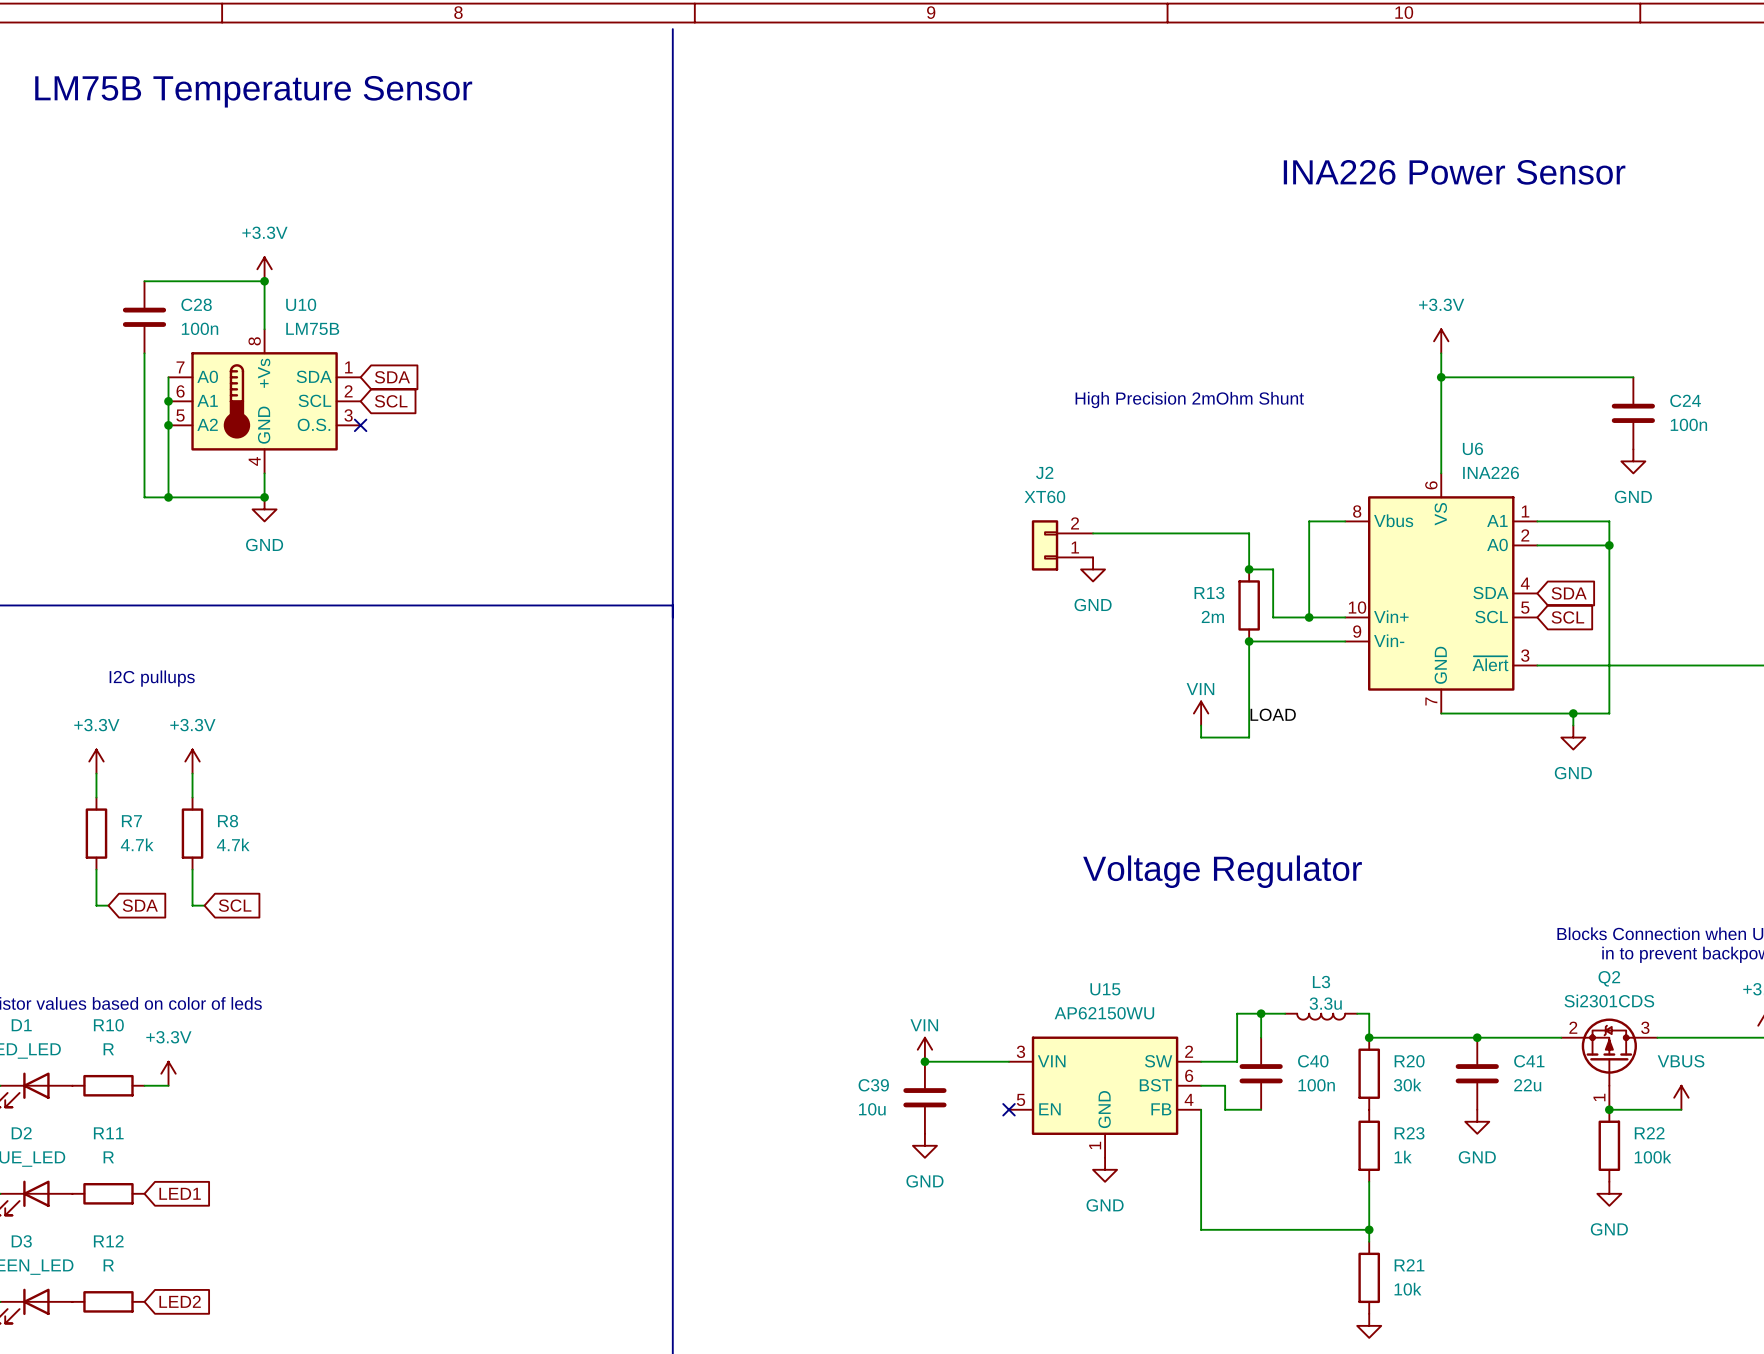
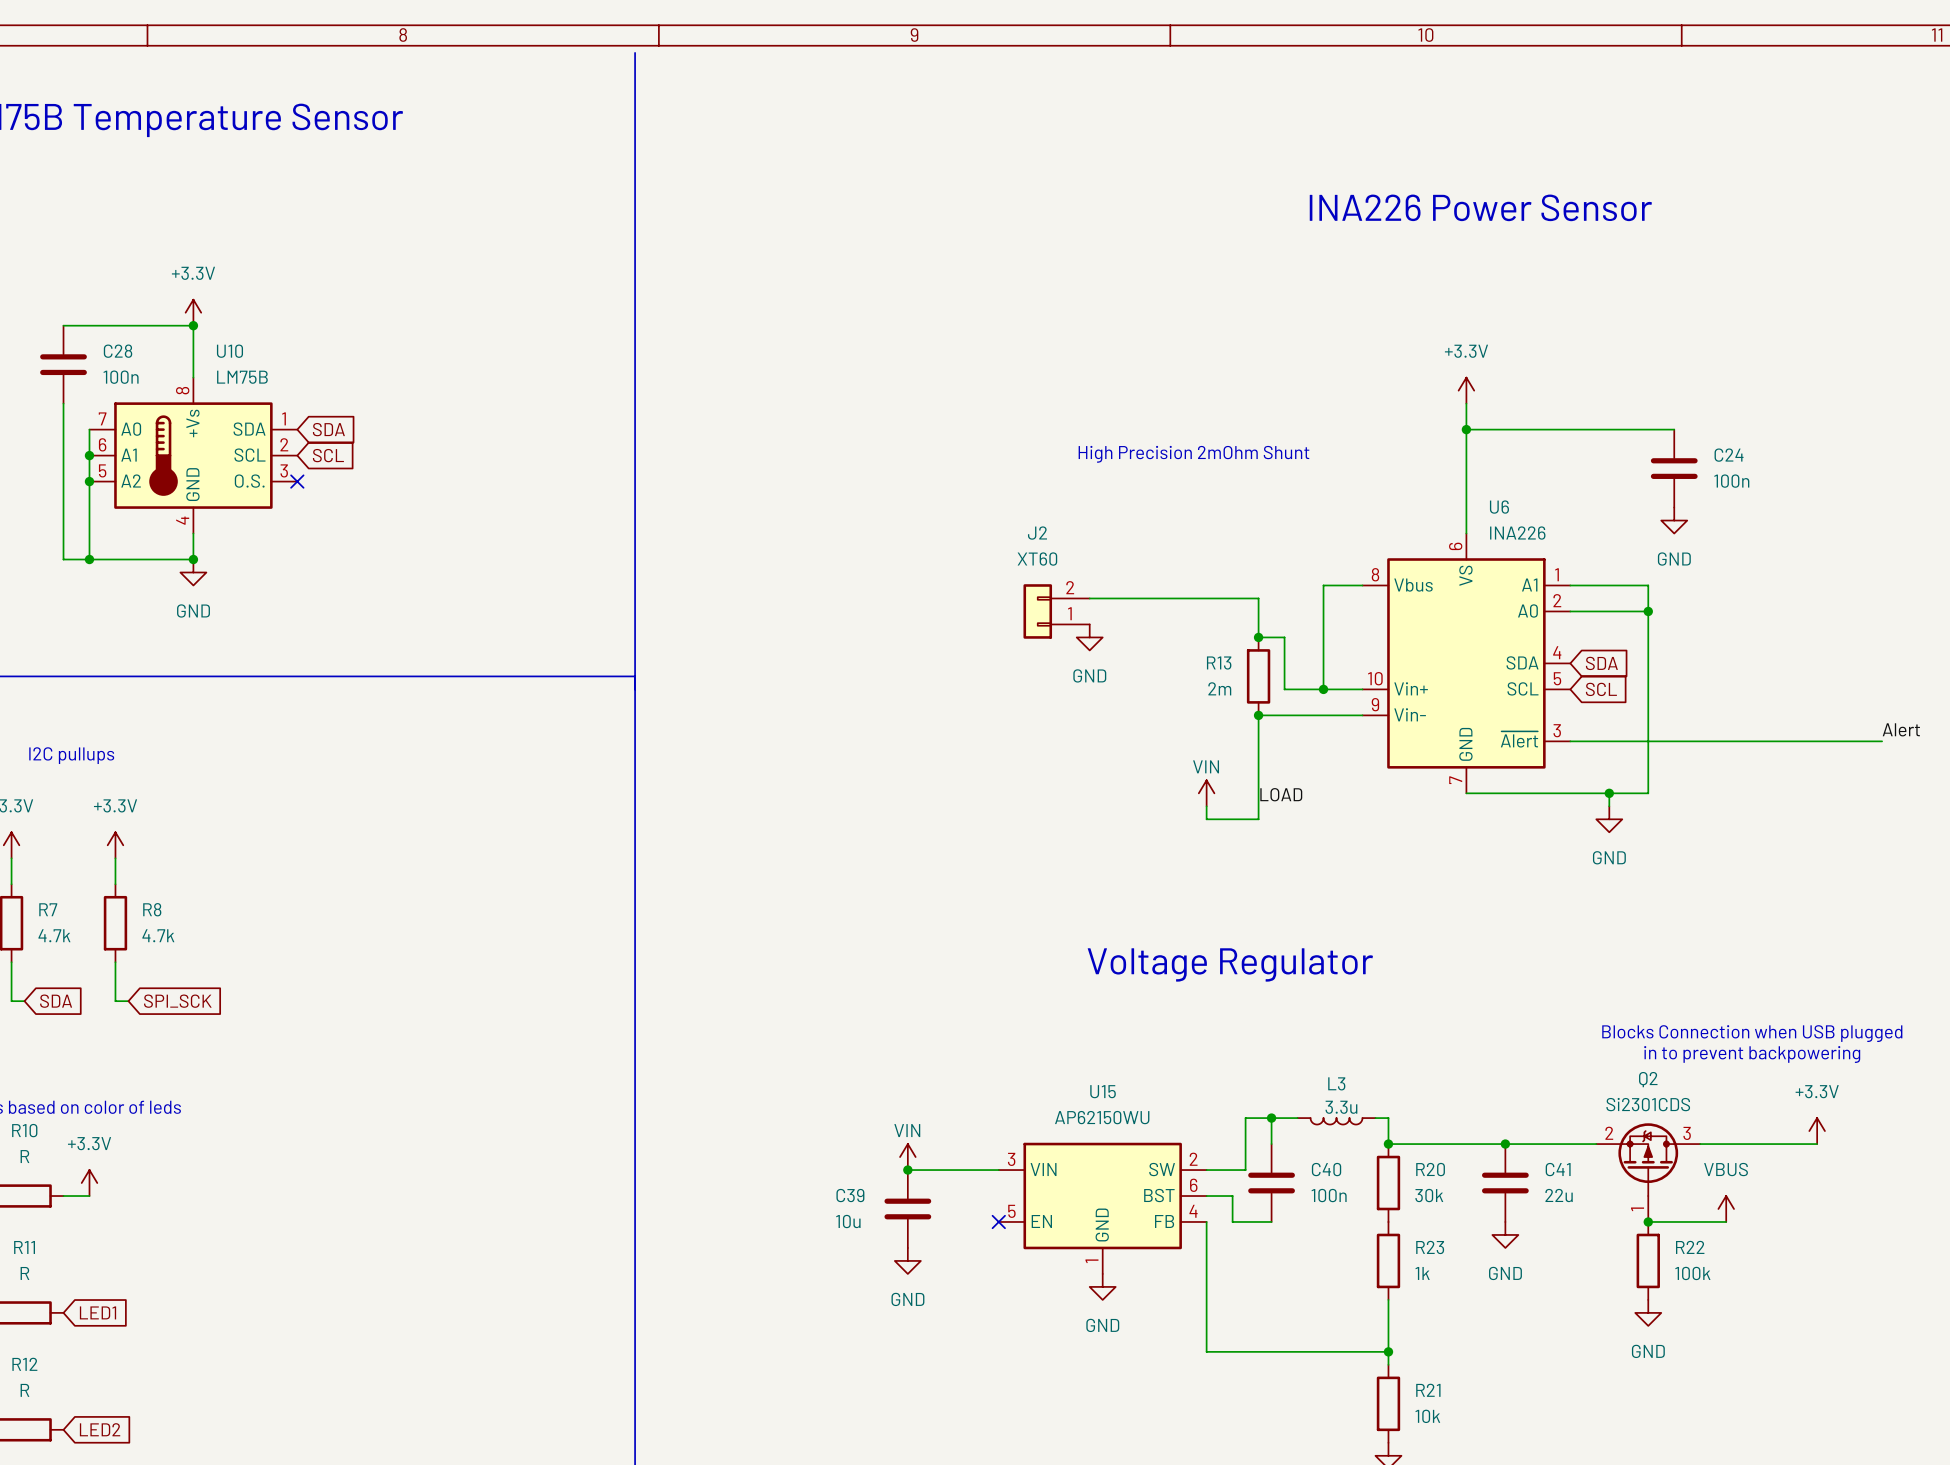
global label: SCL (235, 905) -> SPI_SCK (177, 1001)

